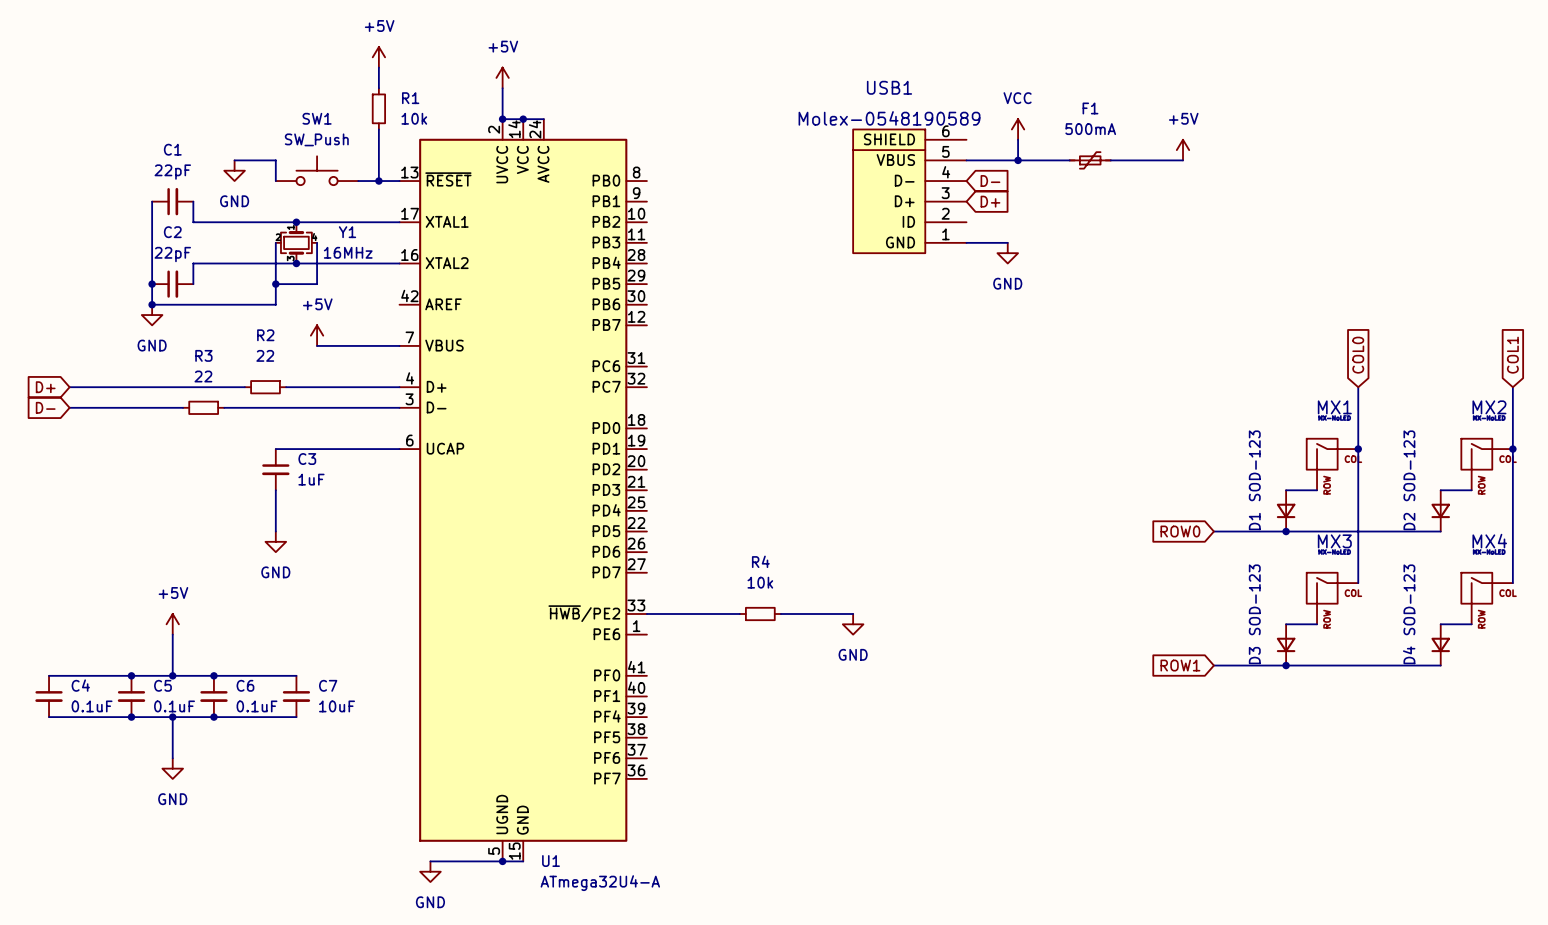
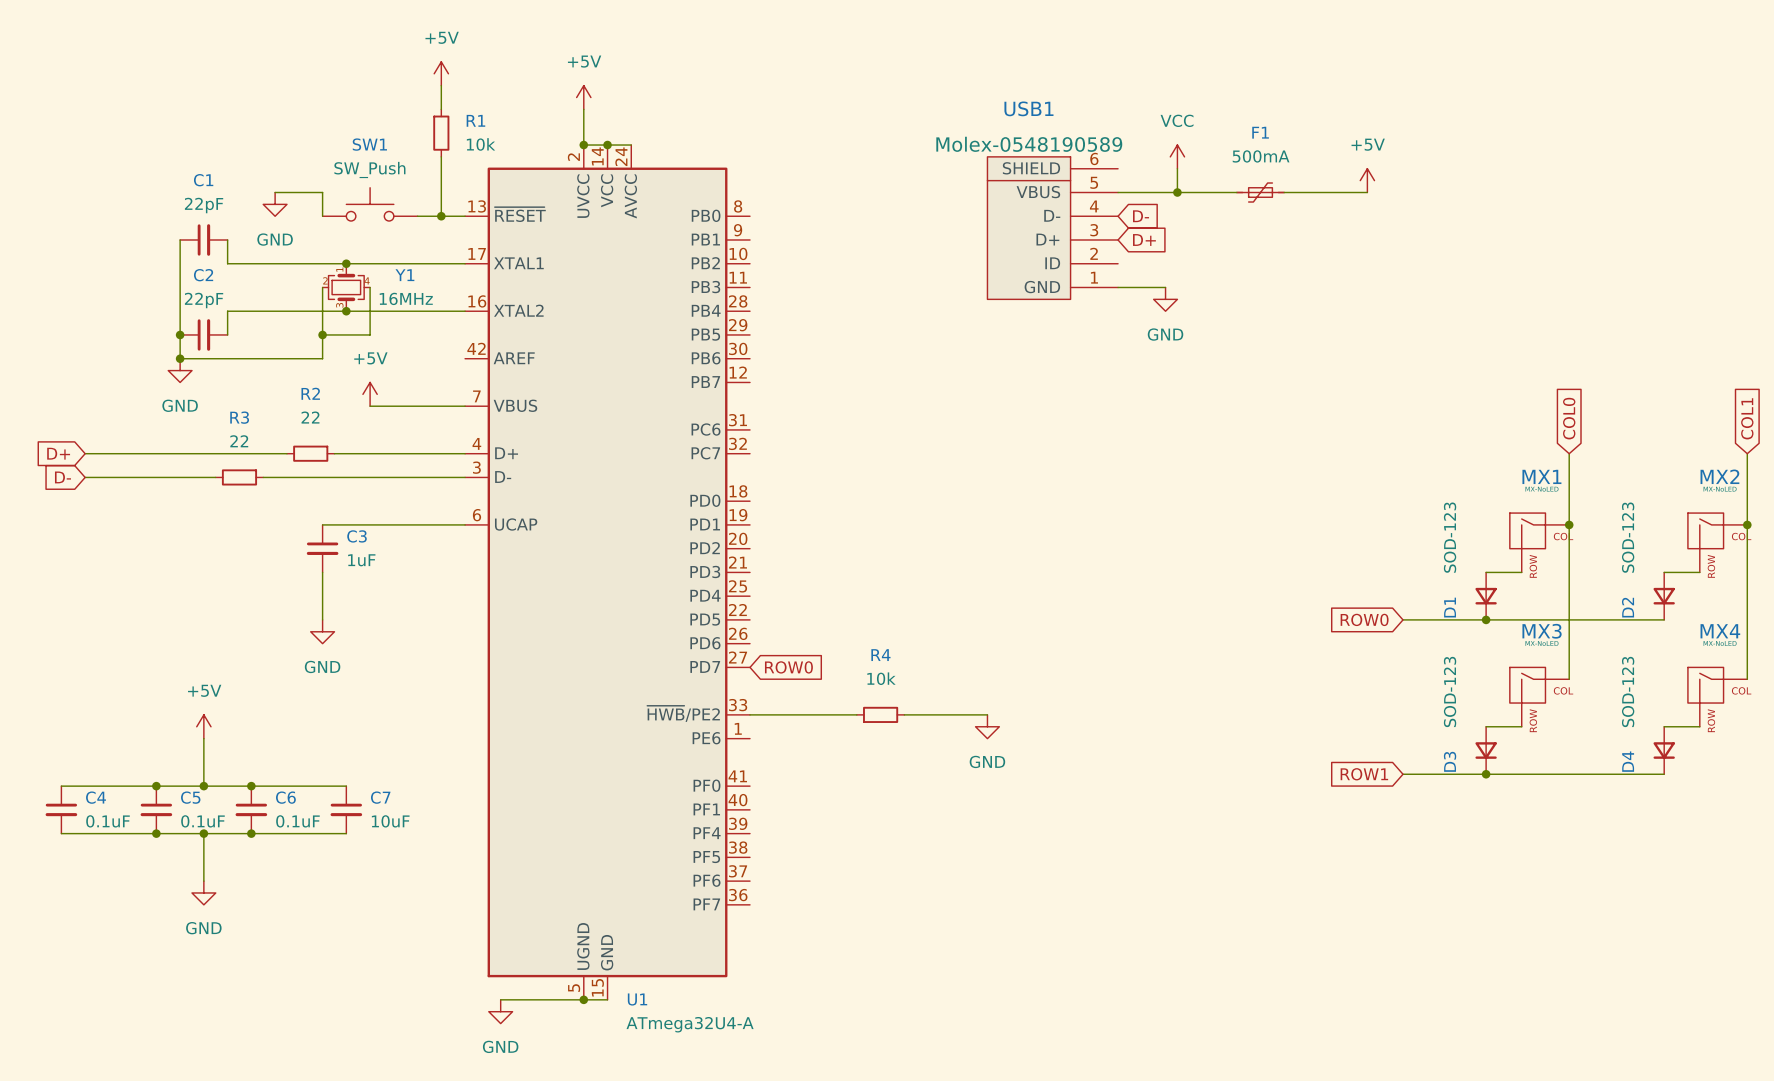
global label: none -> ROW0 (788, 667)

